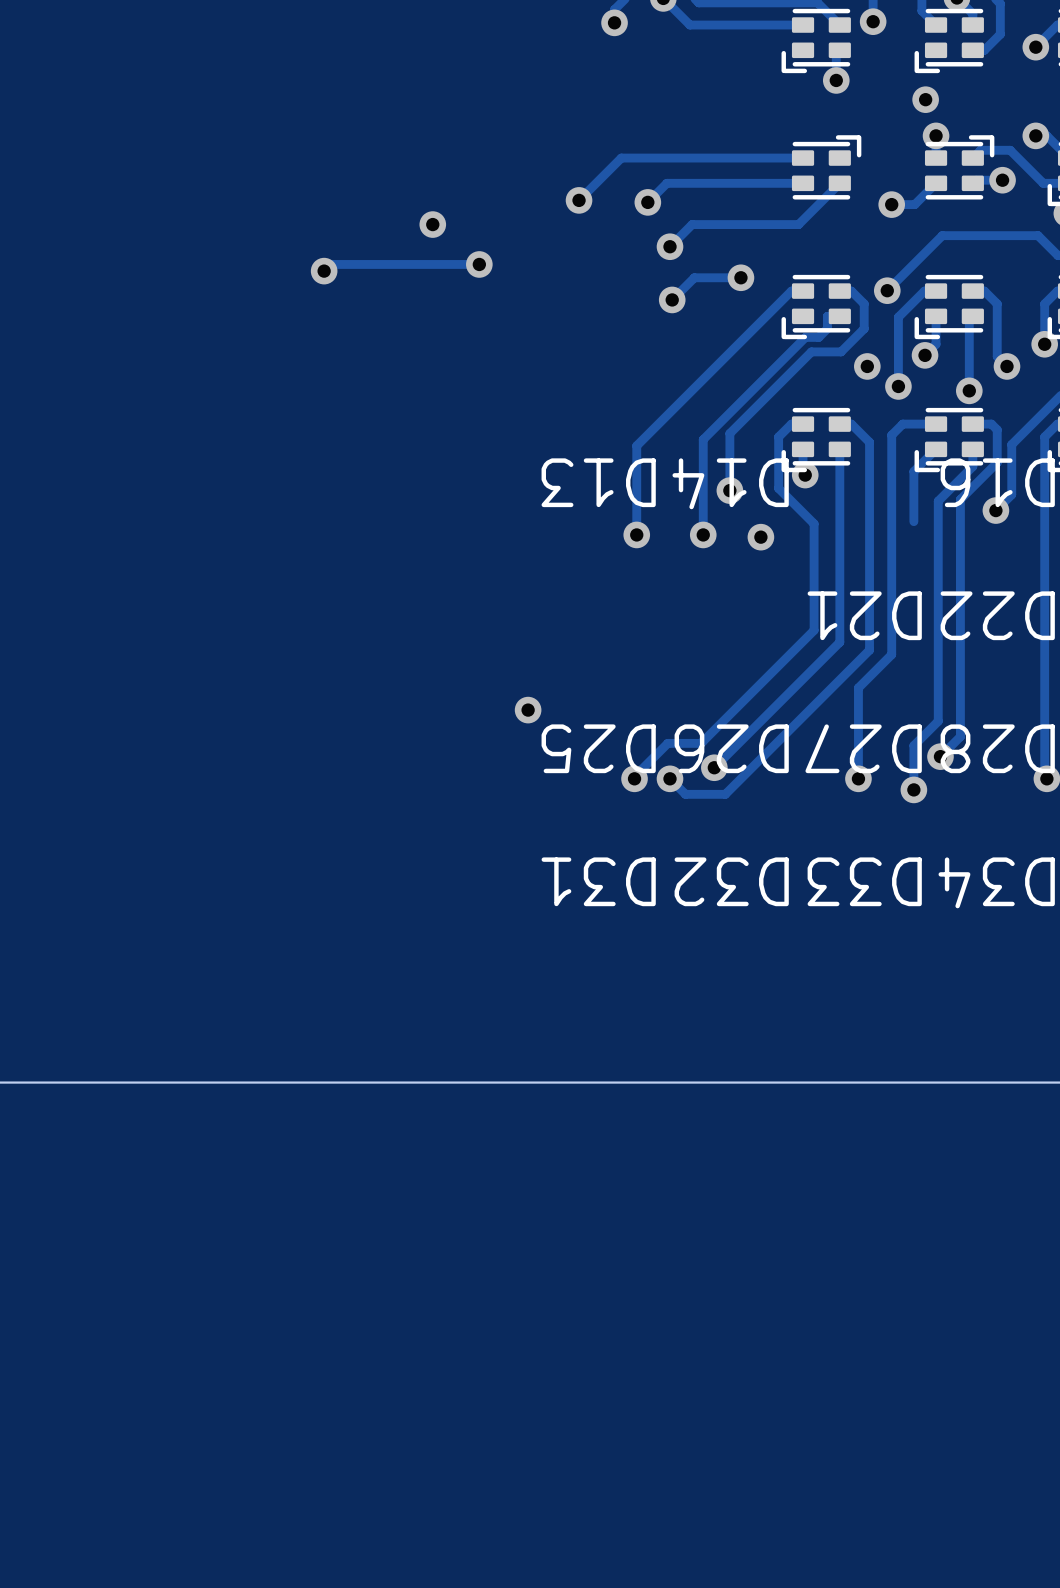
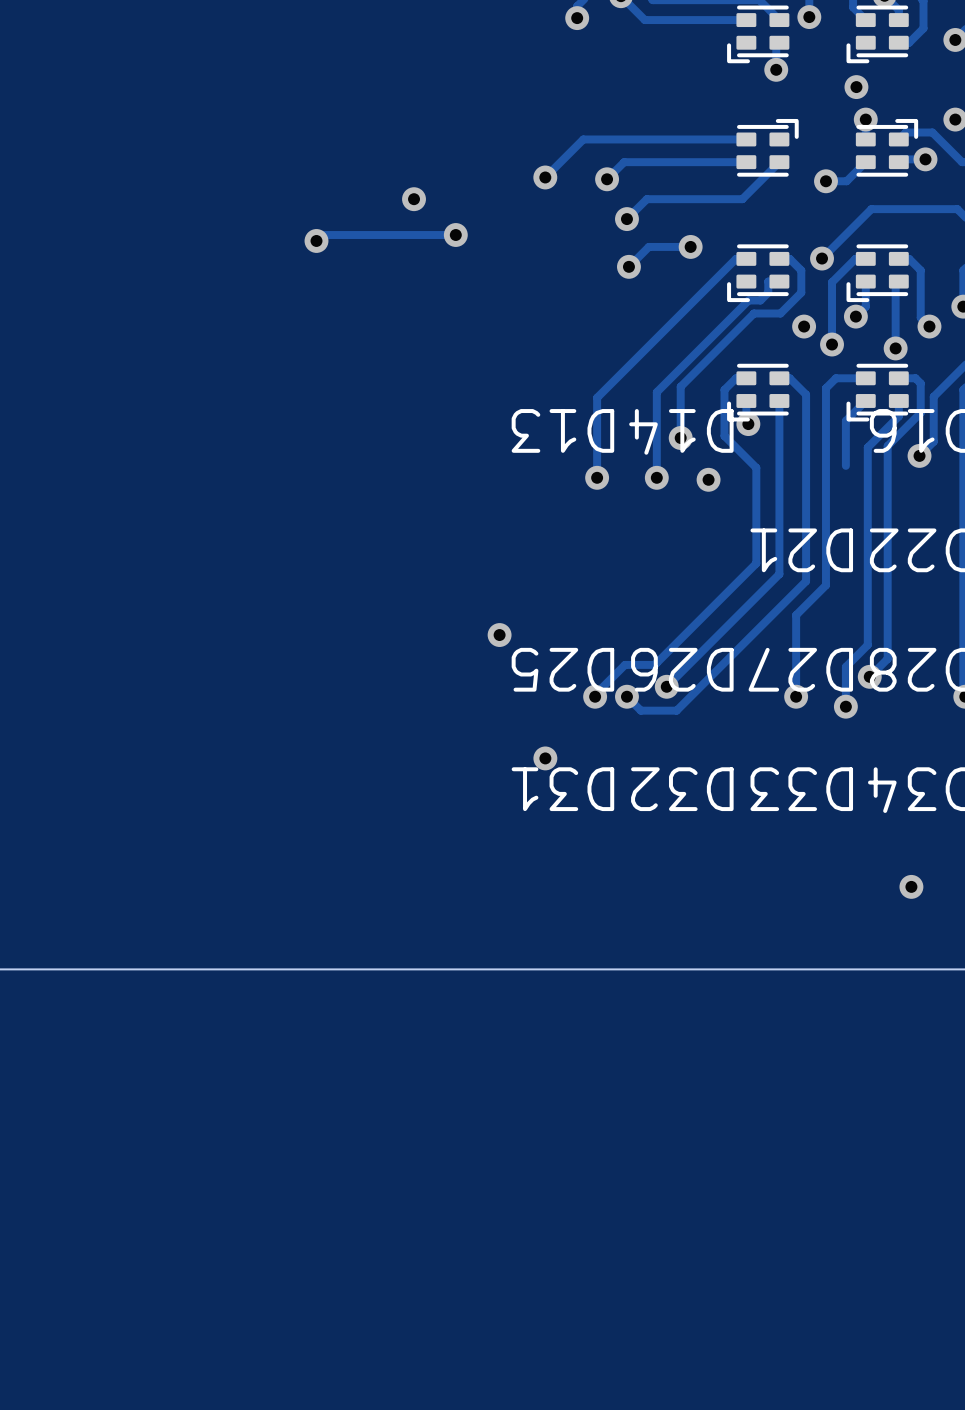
via: none -> (545, 758)
via: none -> (911, 886)

